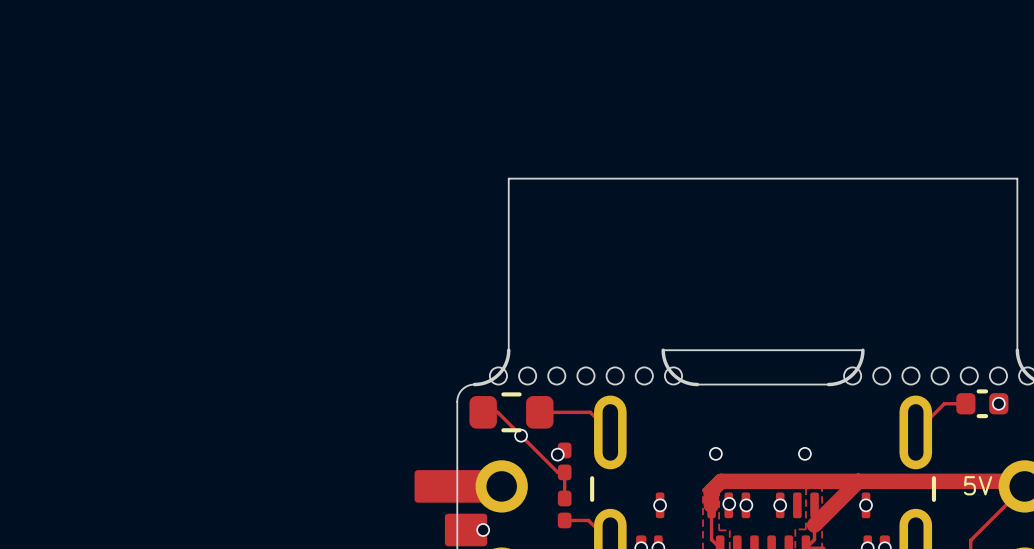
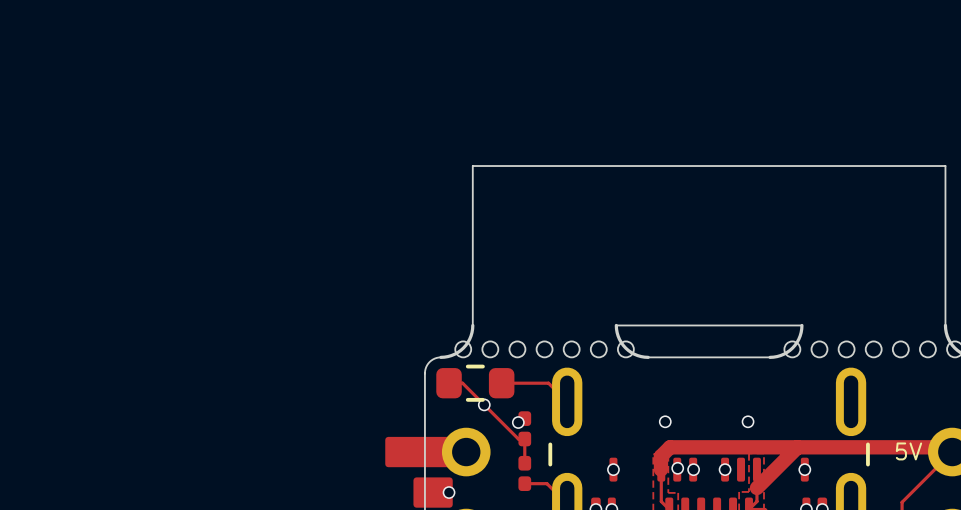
track: (965, 403) (944, 403) (915, 432) -> none
part: (982, 403) -> none
via: (998, 403) -> none

